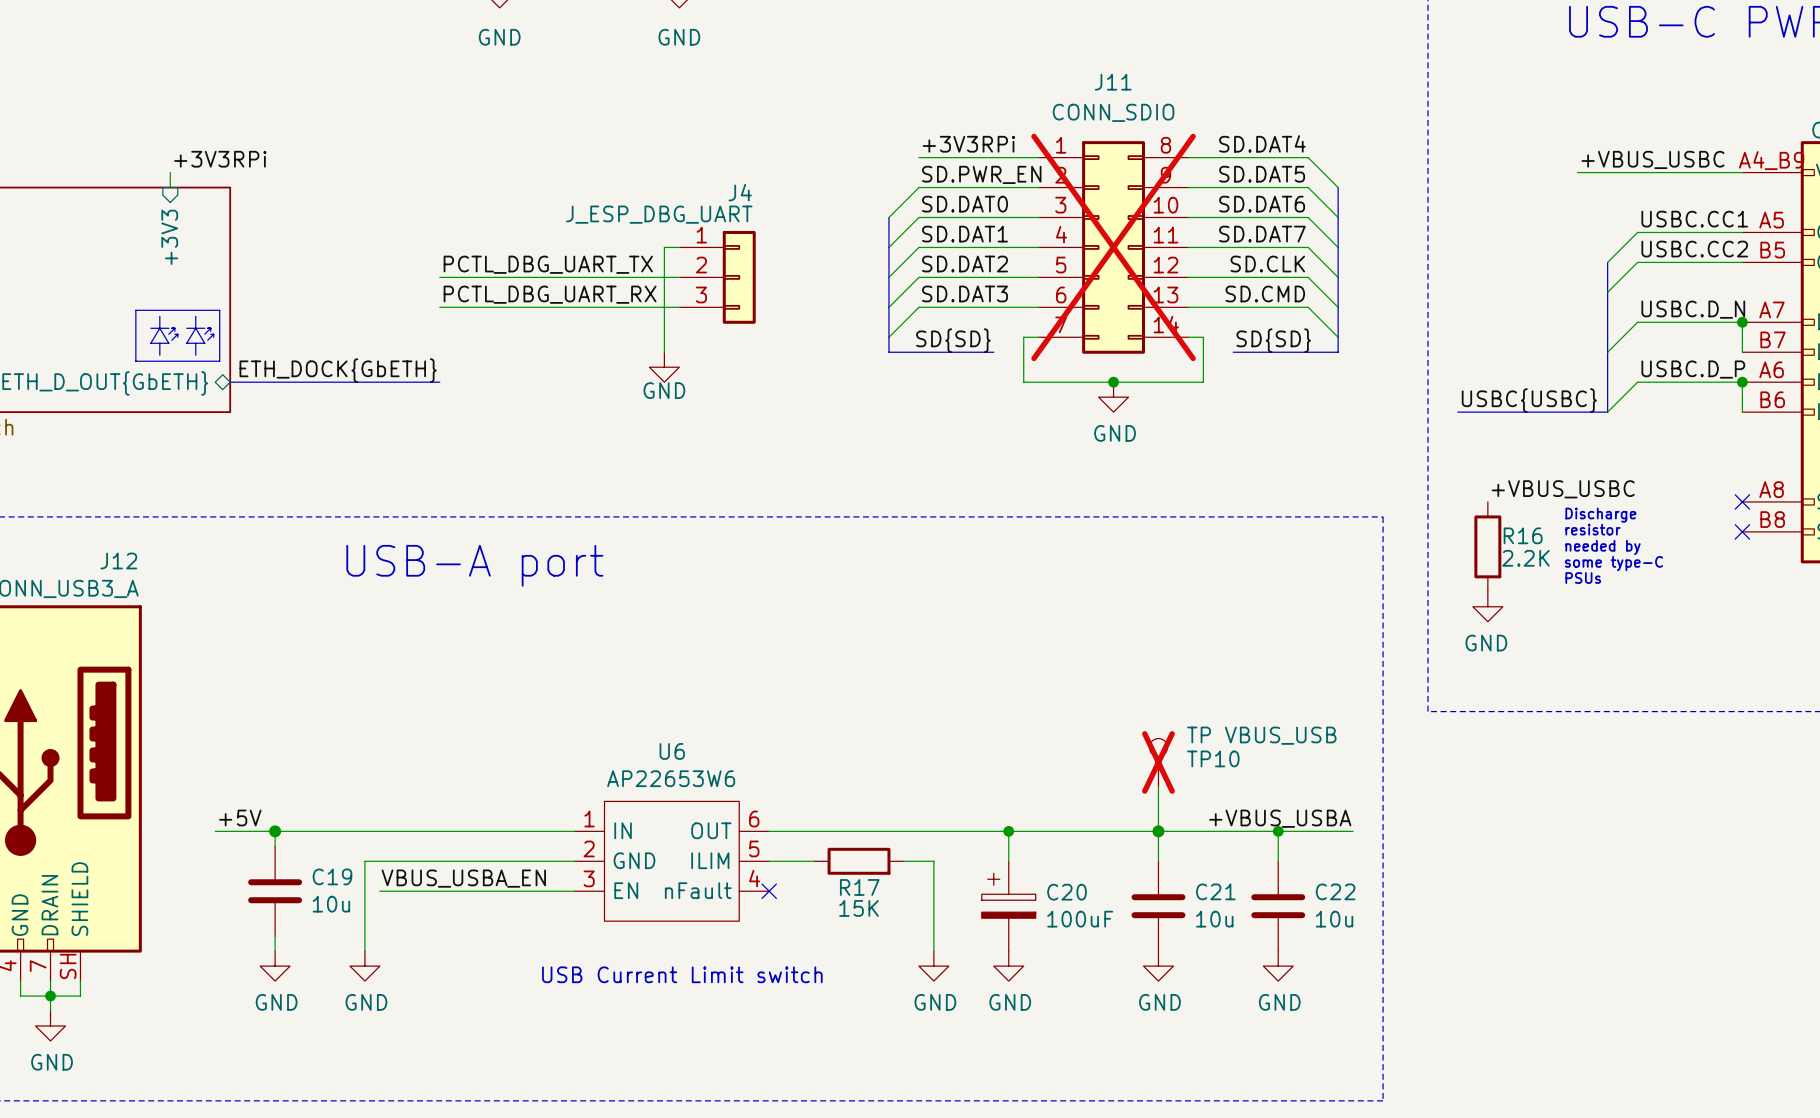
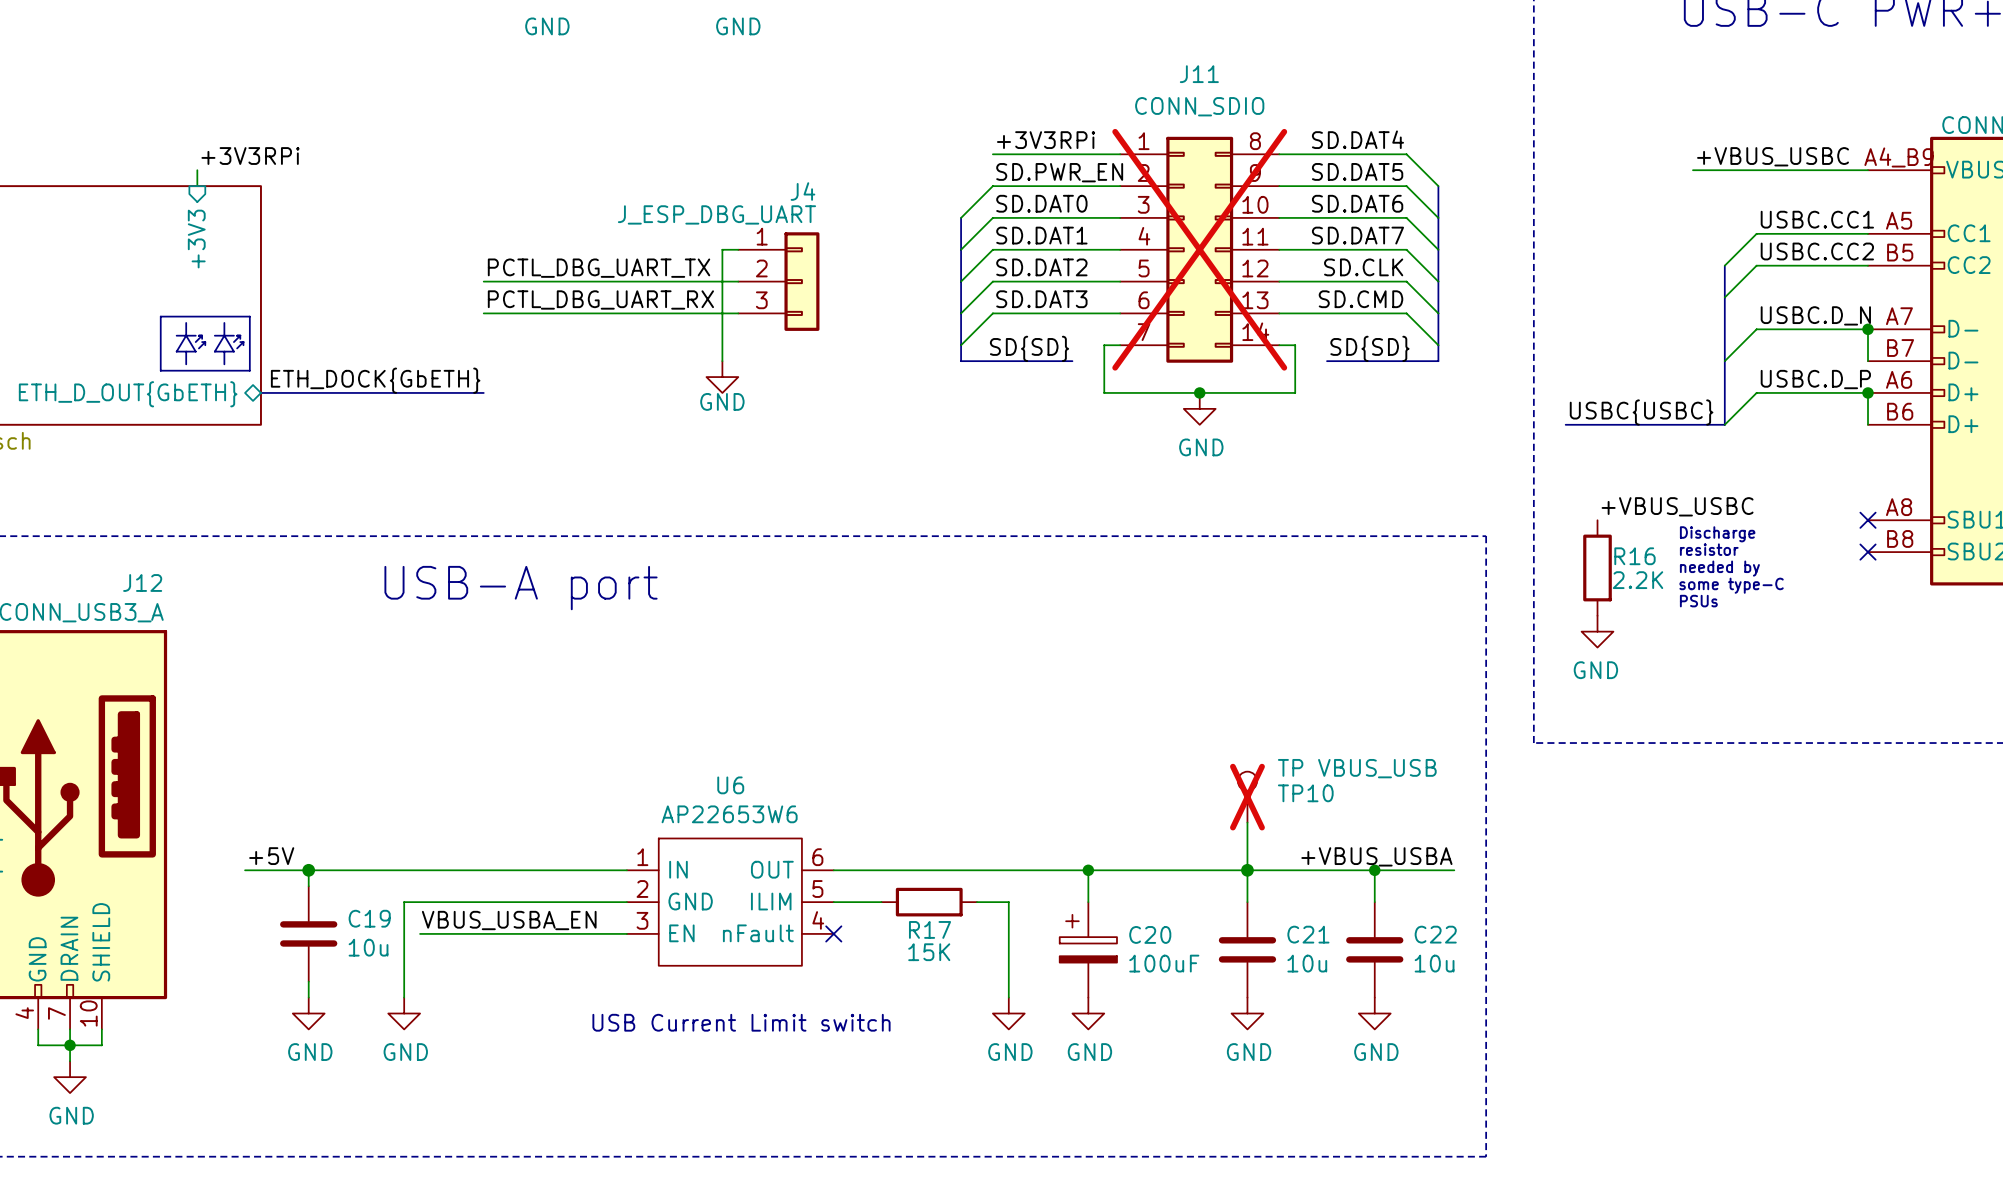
J12 pin number: SH (68, 966) -> 10 (88, 1013)

